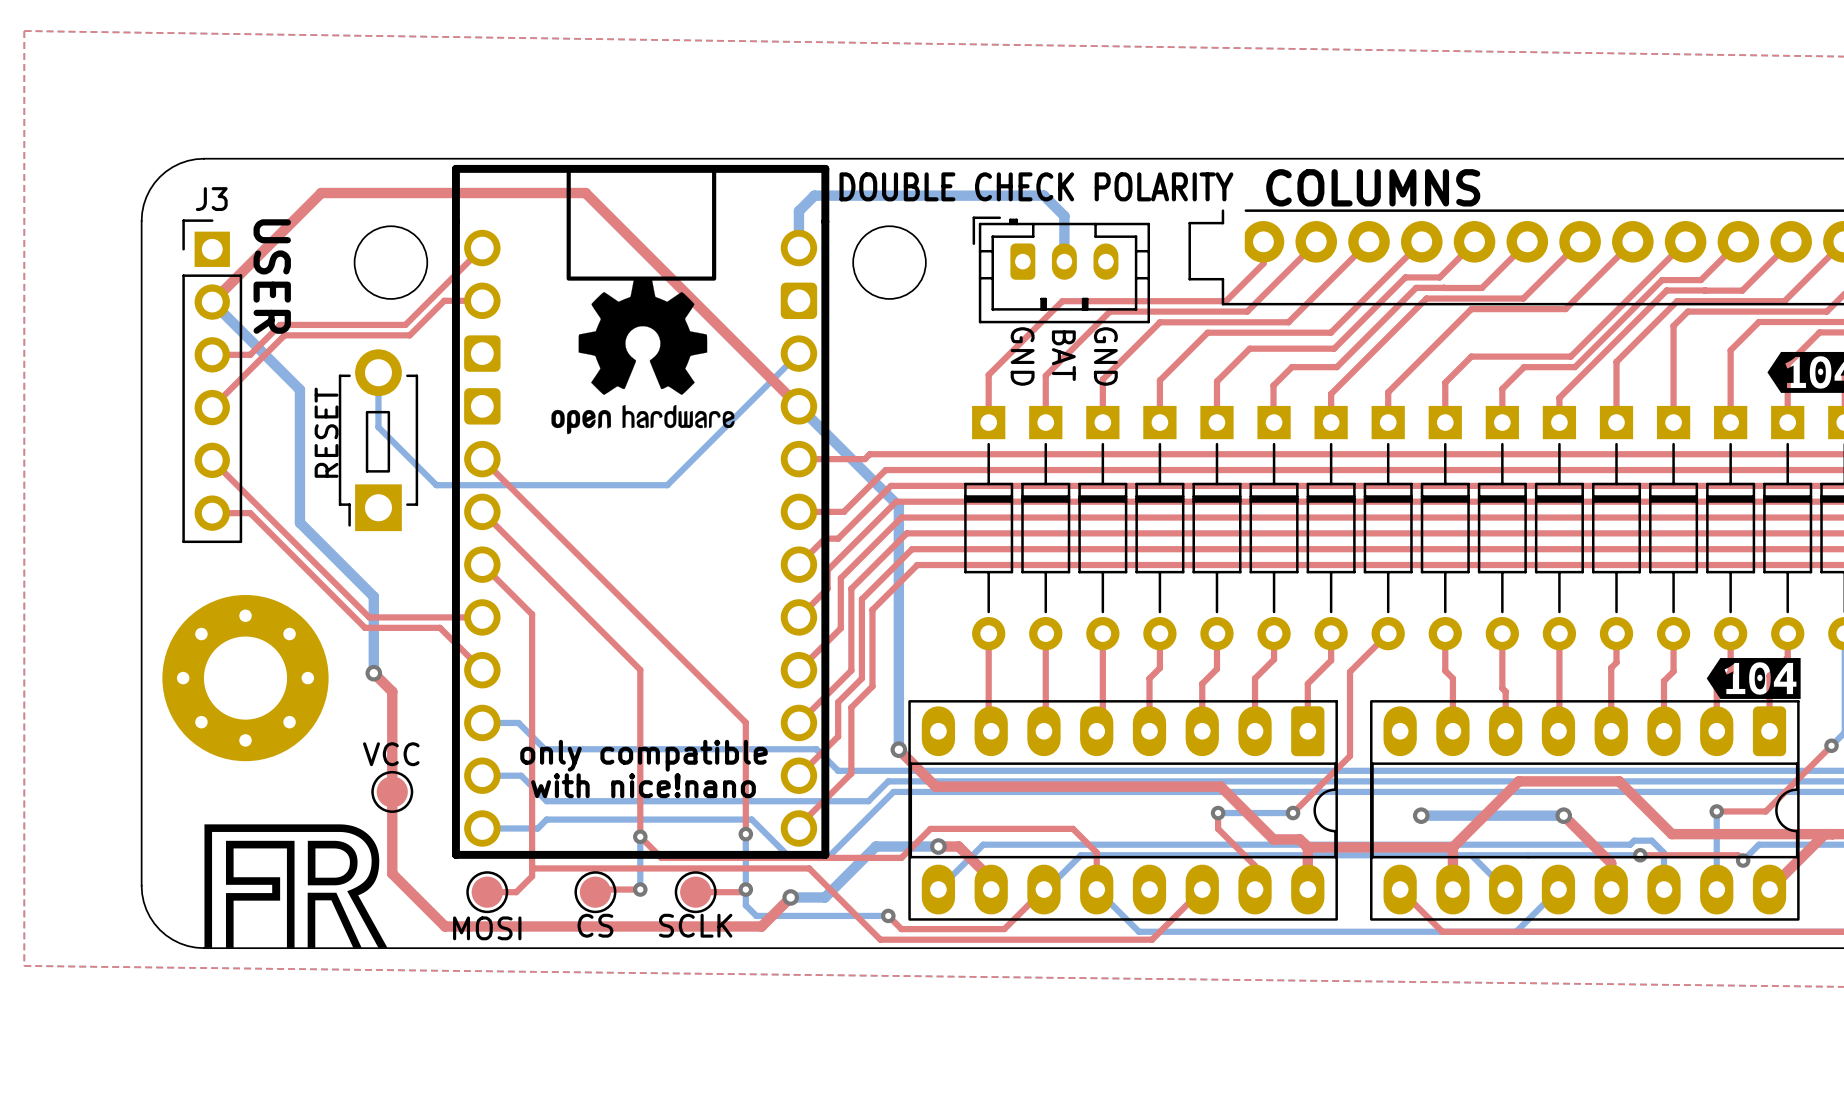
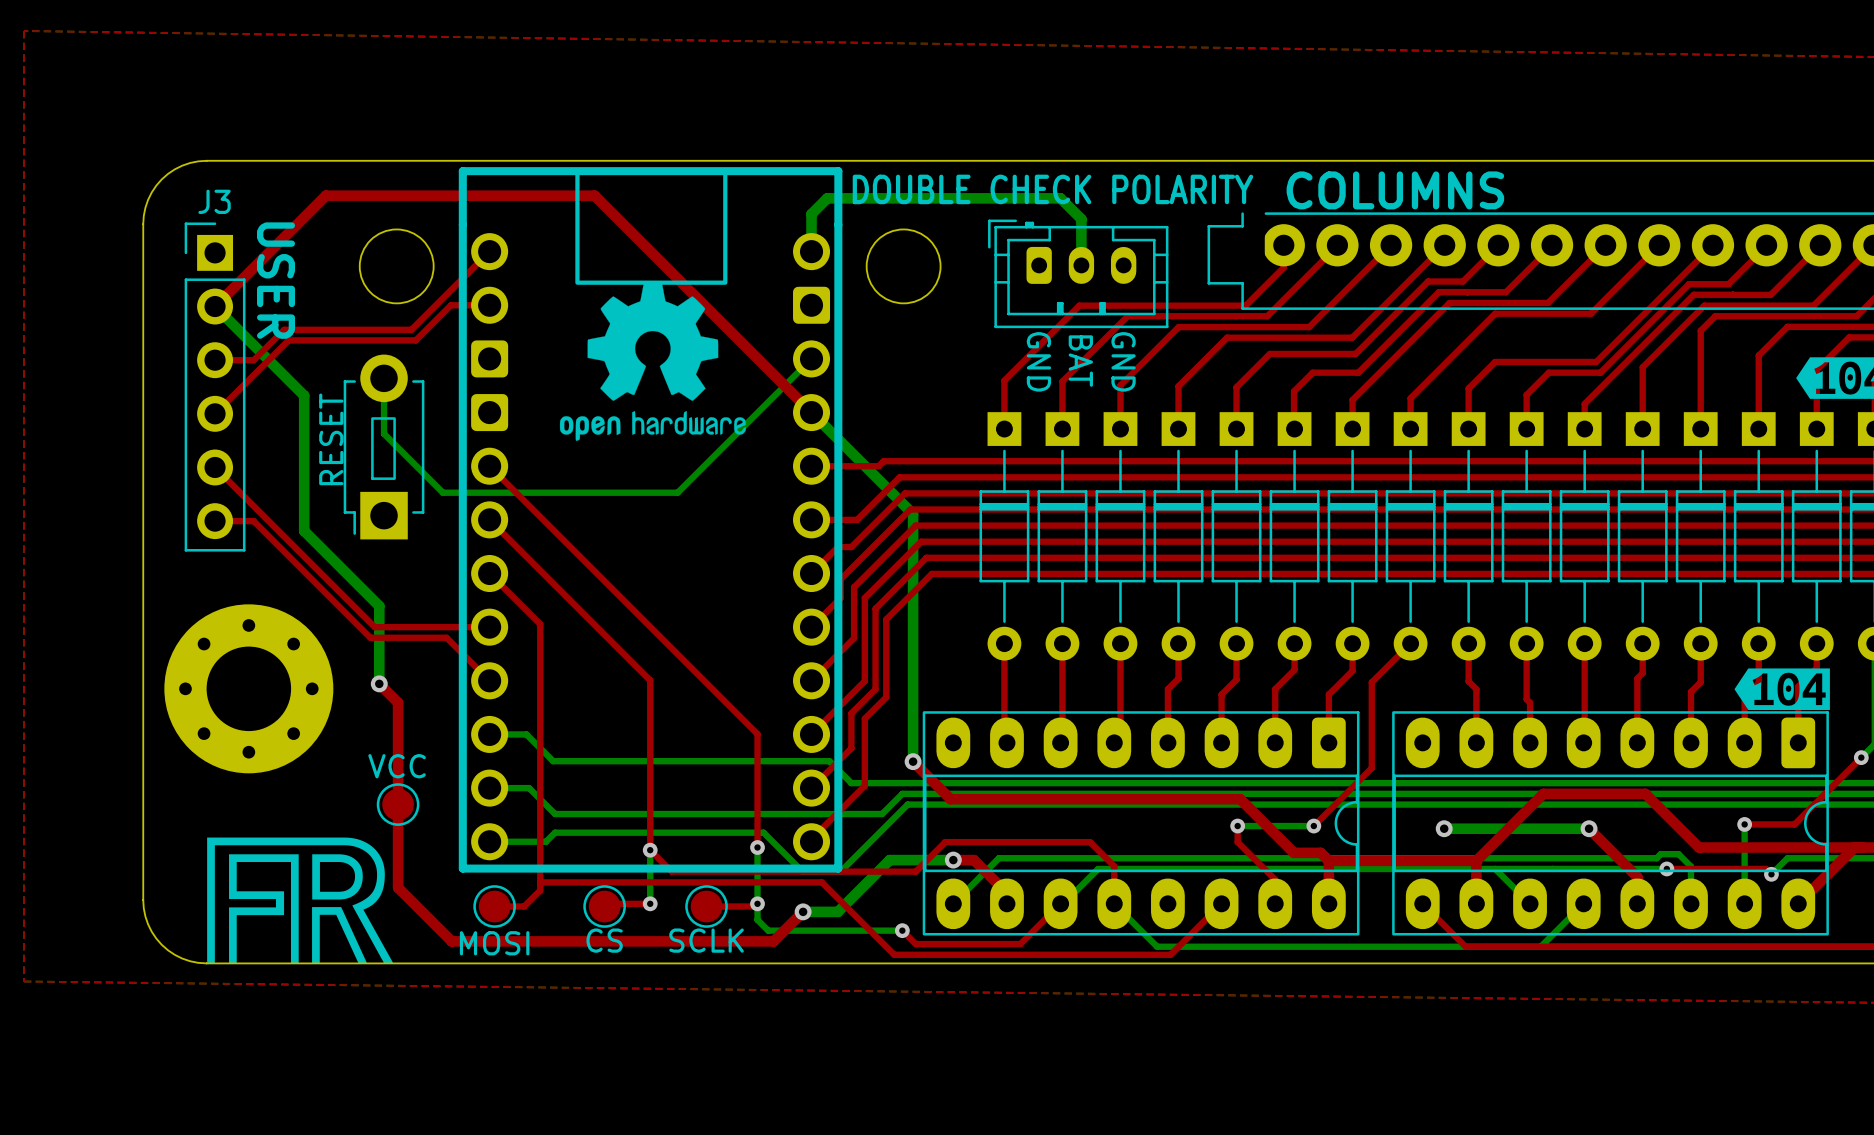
text: only compatible (643, 755) -> none
text: with nice!nano (643, 785) -> none

